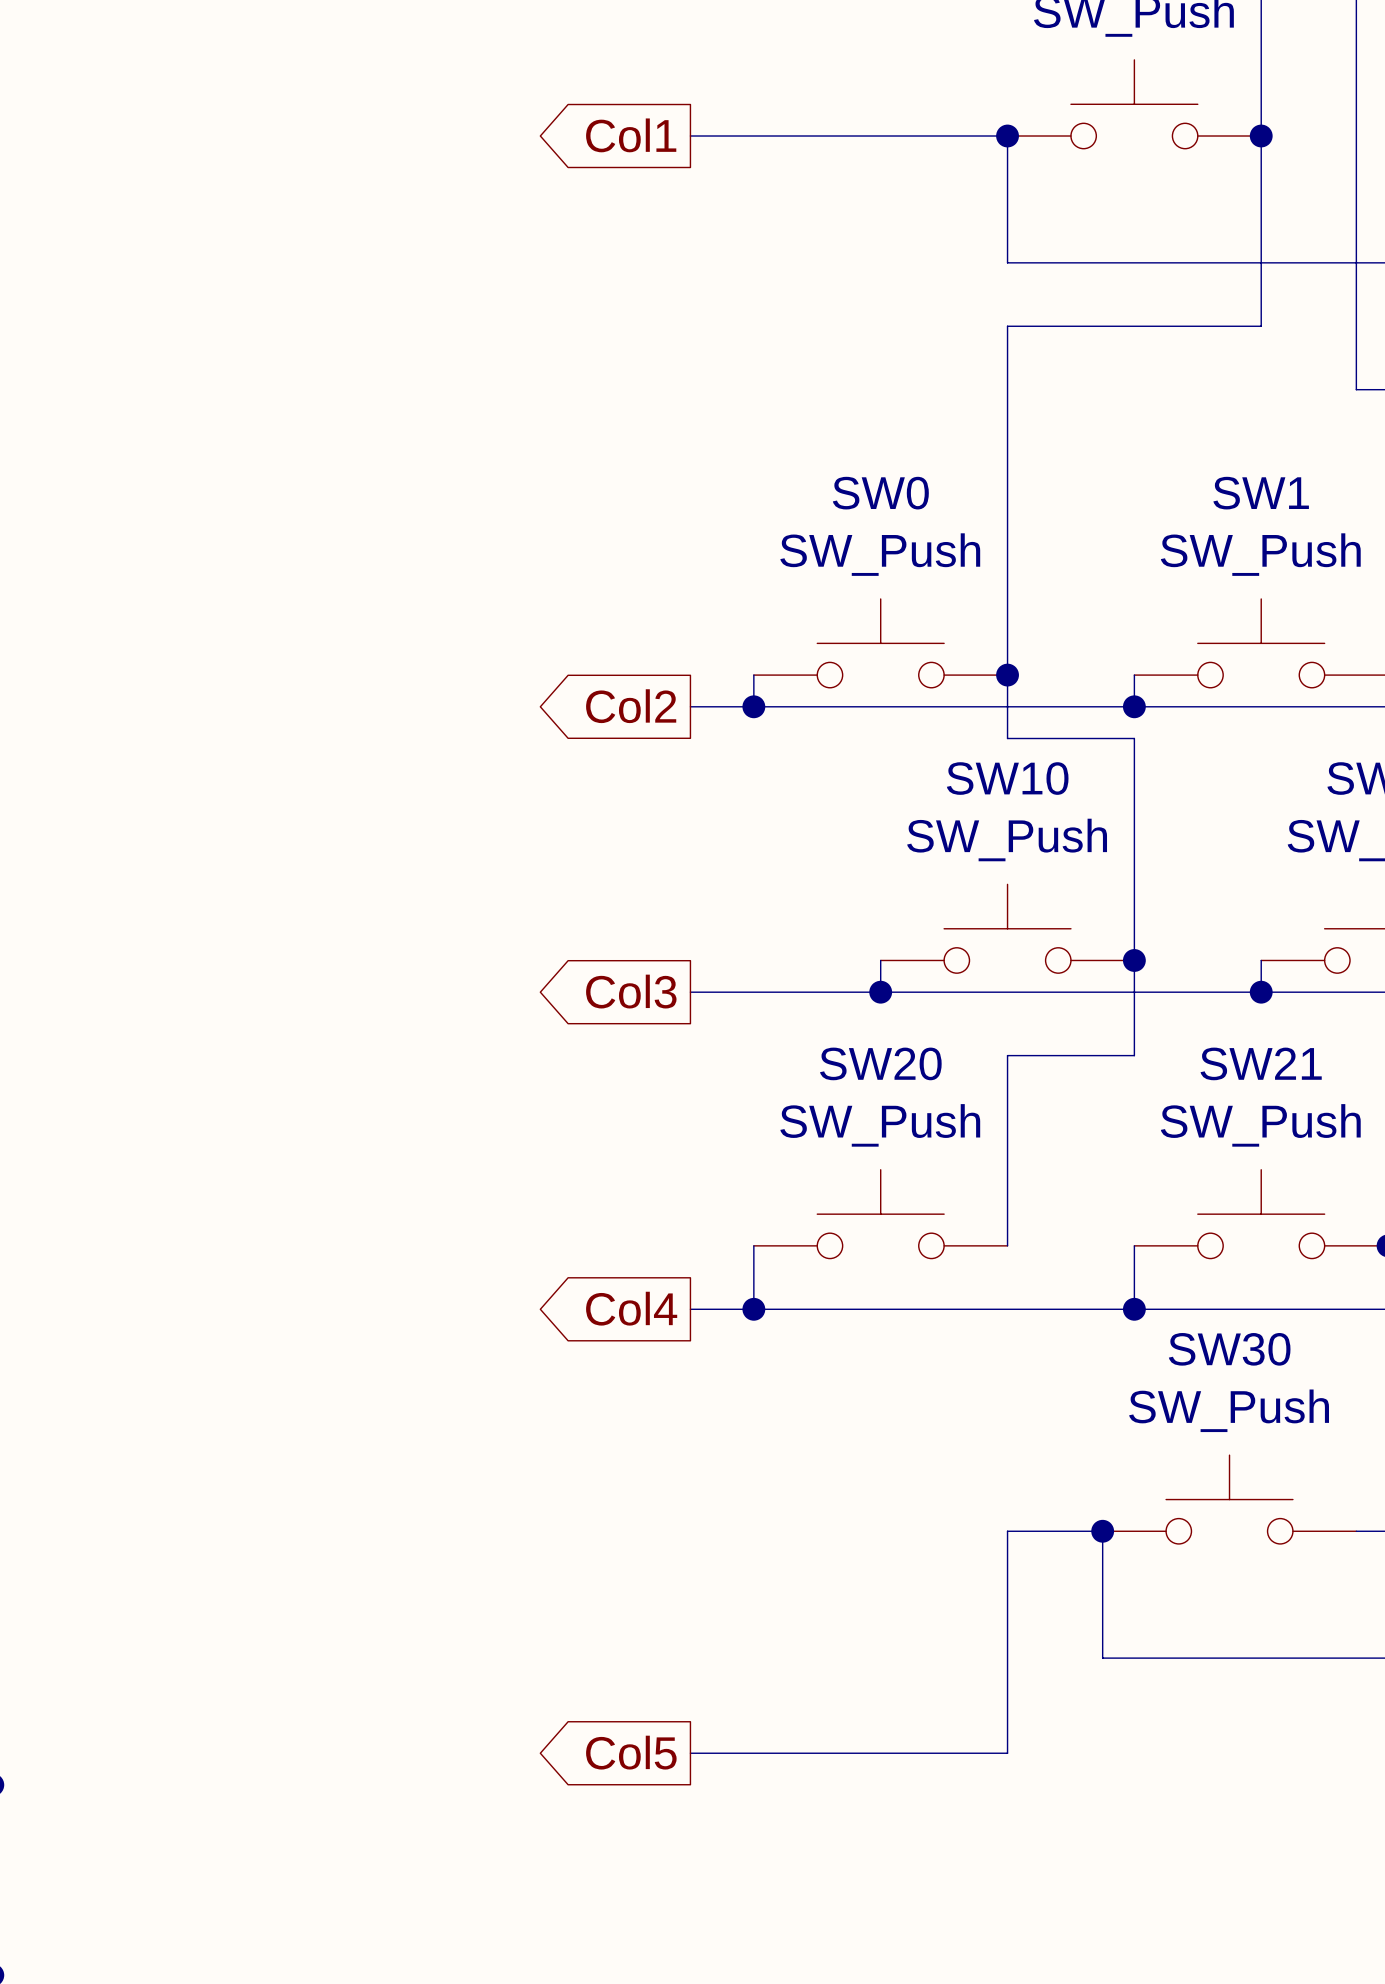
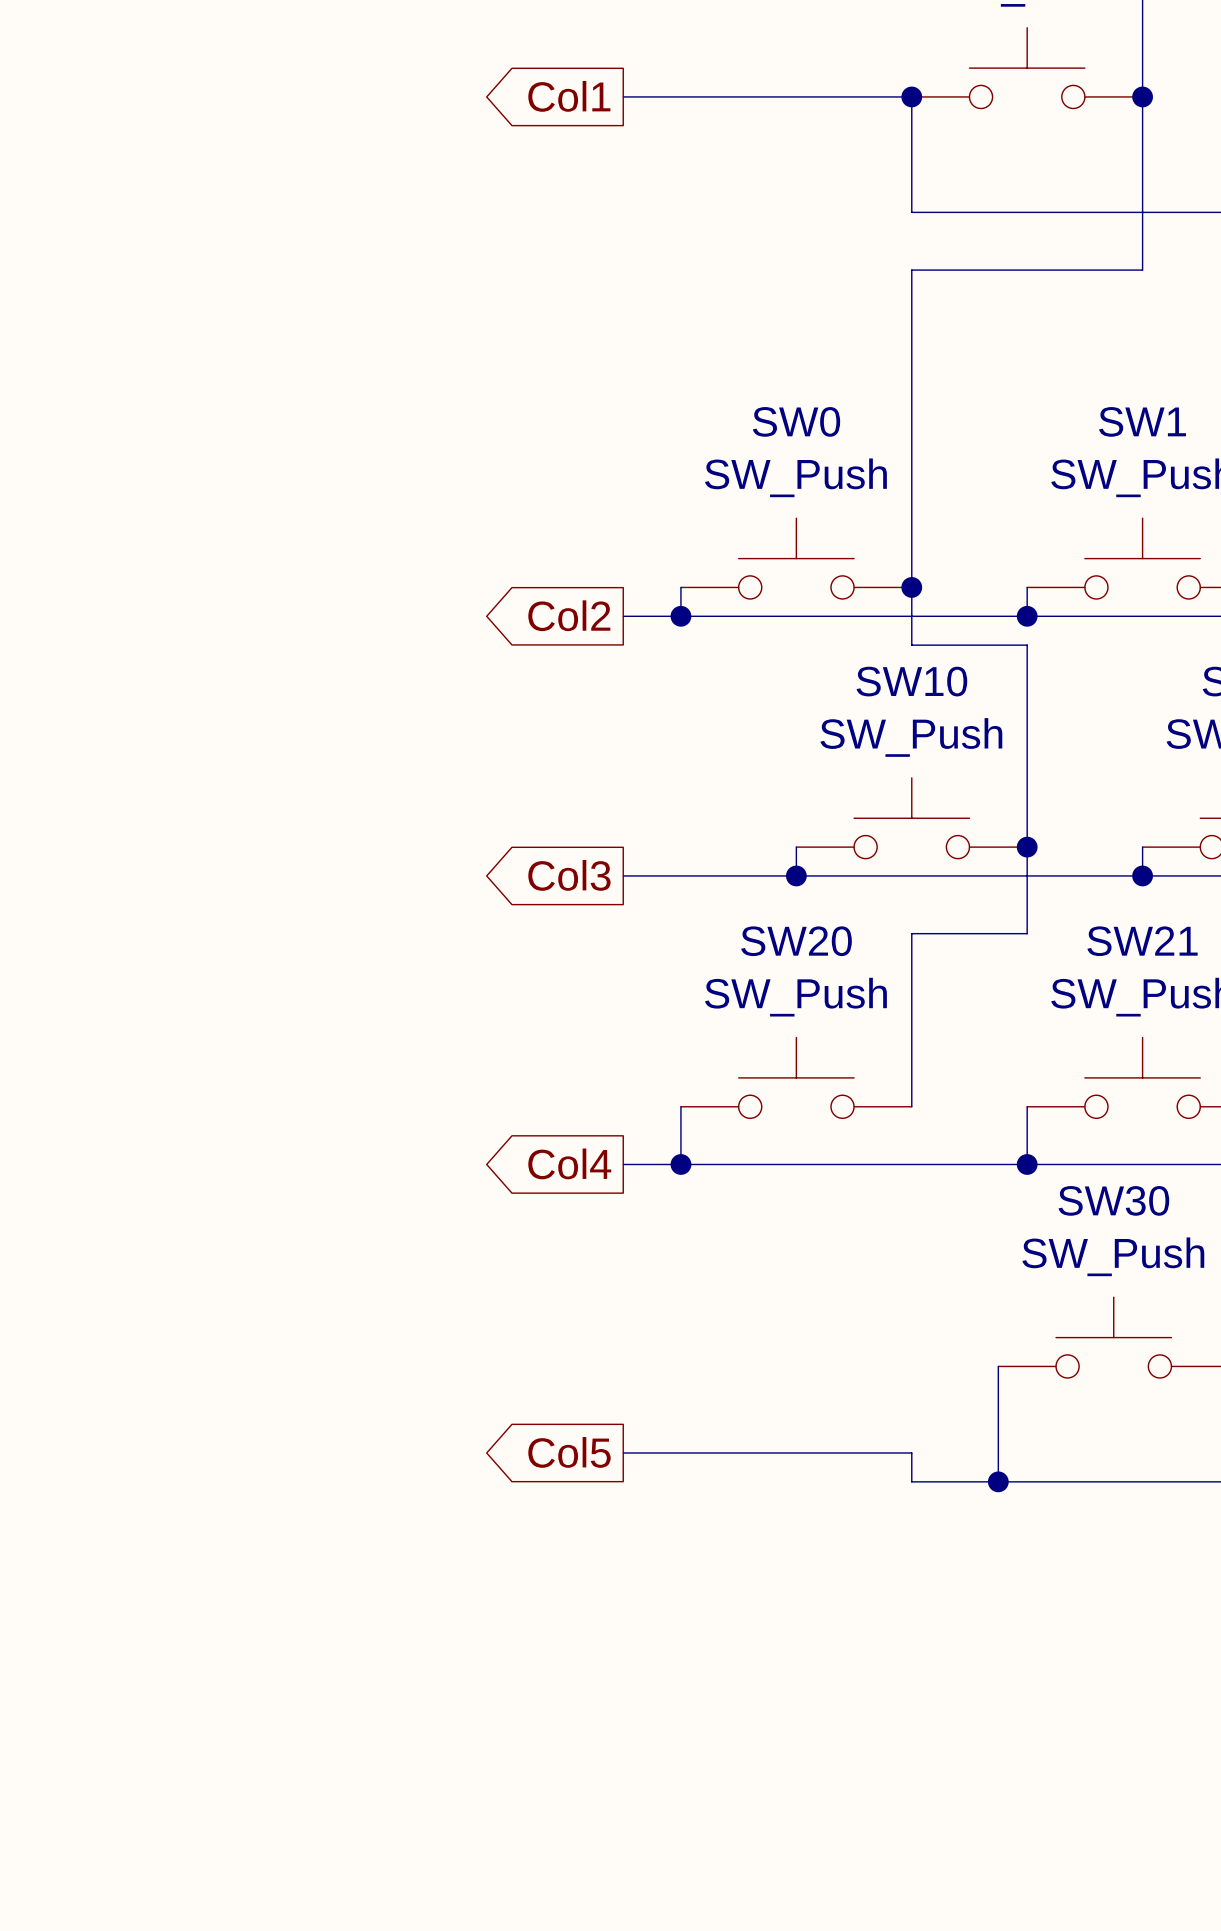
wire: (1102, 1531) (1007, 1531) (1007, 1626) -> (623, 1453) (911, 1453)
junction position: (1102, 1531) -> (998, 1481)
wire: (1007, 1658) (1007, 1753) (690, 1753) -> (911, 1481) (998, 1481)
global label position: Col5 (631, 1752) -> Col5 (569, 1452)

